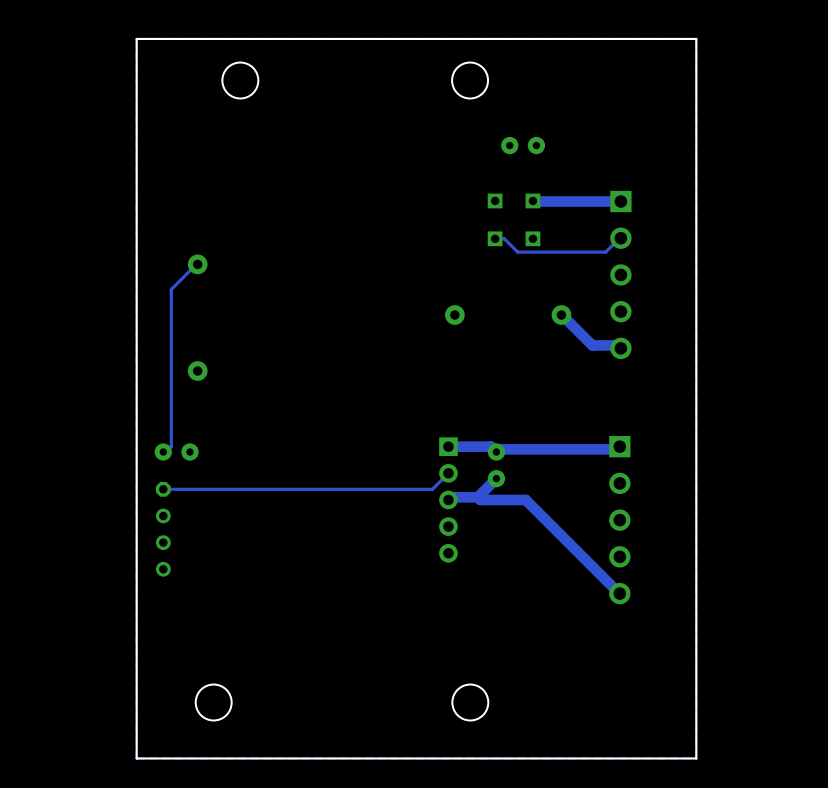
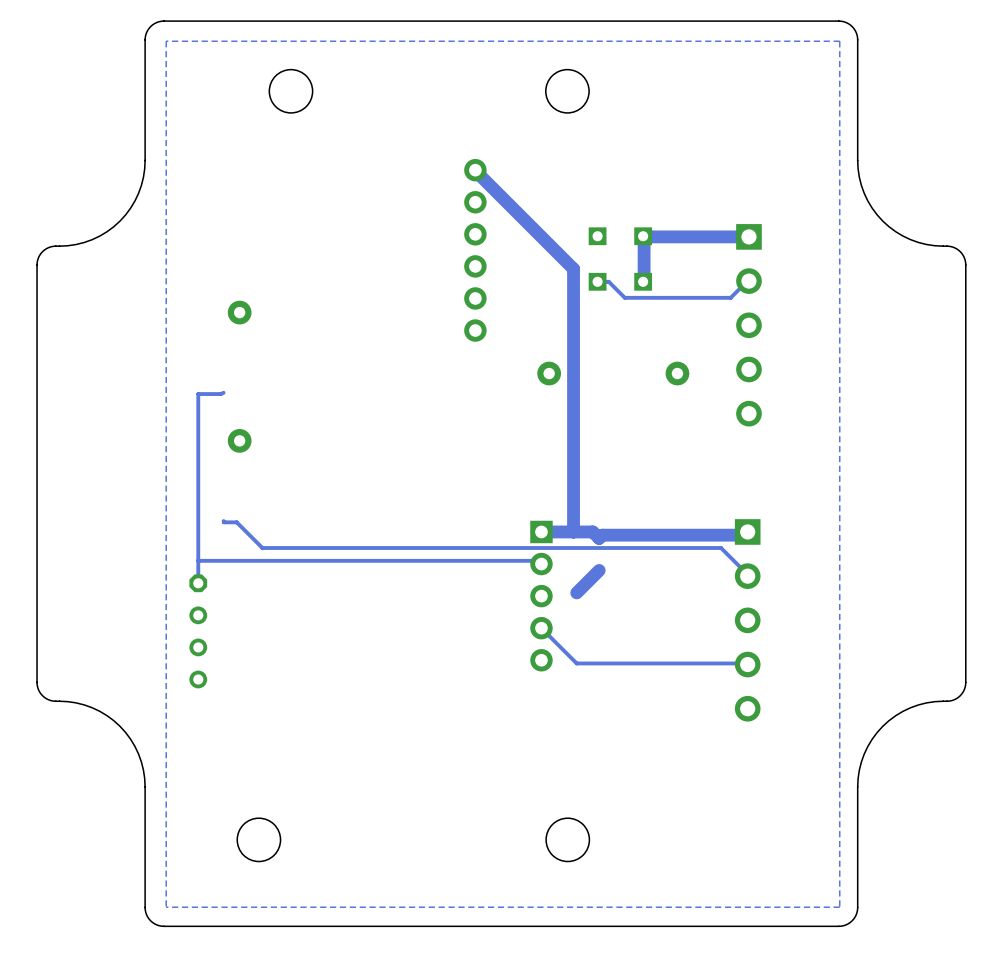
board edge: (696, 38) (696, 758) (136, 758) (136, 38) (696, 38) -> (838, 21) (852, 26) (857, 37) (858, 168) (861, 185) (867, 200) (877, 214) (895, 231) (918, 242) (955, 248) (962, 254) (965, 265) (965, 684) (961, 693) (954, 699) (918, 704) (895, 715) (877, 732) (867, 746) (861, 762) (858, 778) (857, 907) (853, 918) (846, 924) (838, 926) (163, 926) (152, 922) (146, 914) (145, 907) (144, 778) (141, 762) (134, 746) (125, 732) (107, 715) (84, 704) (48, 699) (40, 693) (37, 682) (37, 262) (40, 253) (48, 247) (84, 242) (107, 231) (125, 214) (134, 200) (141, 185) (144, 168) (145, 39) (149, 28) (156, 22) (163, 21) (838, 21)
part: (523, 145) -> none
track: none -> (475, 170) (573, 268) (573, 531)
track: none -> (644, 236) (643, 281)
part: none -> (475, 250)
track: (197, 264) (171, 289) (171, 446) (163, 452) -> none
track: (561, 315) (592, 345) (616, 345) (620, 348) -> none
track: none -> (223, 392) (198, 394) (198, 583)
track: none -> (223, 521) (236, 522) (262, 548) (721, 548) (747, 576)
part: (176, 452) -> none
part: (496, 465) -> none
track: (448, 473) (432, 489) (163, 489) -> (541, 564) (538, 560) (198, 560)
track: (448, 499) (451, 497) (477, 497) (480, 499) (525, 499) (619, 593) -> none
track: none -> (541, 628) (576, 663) (747, 664)

